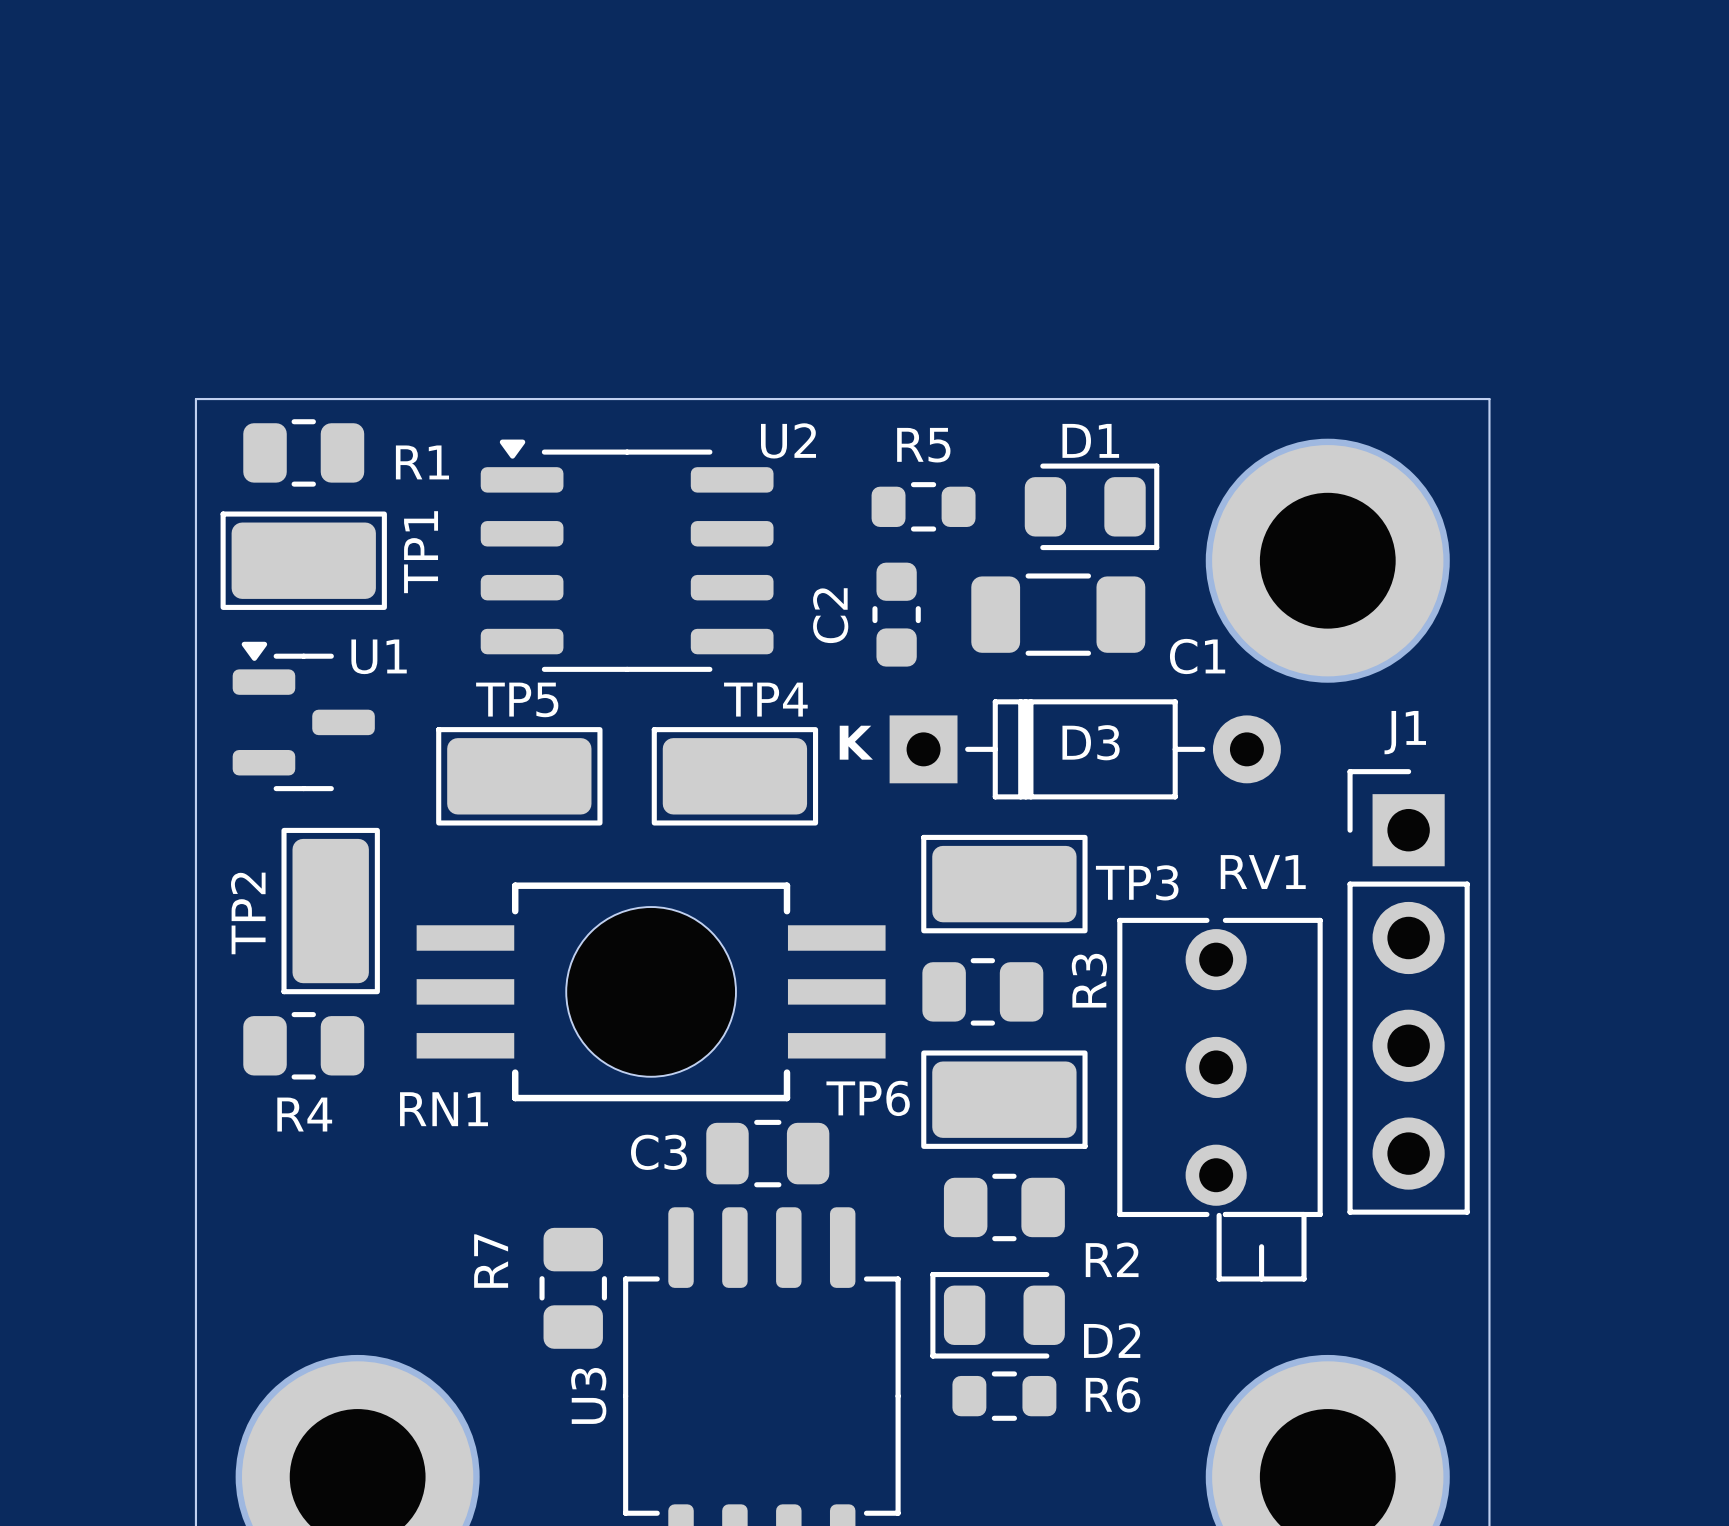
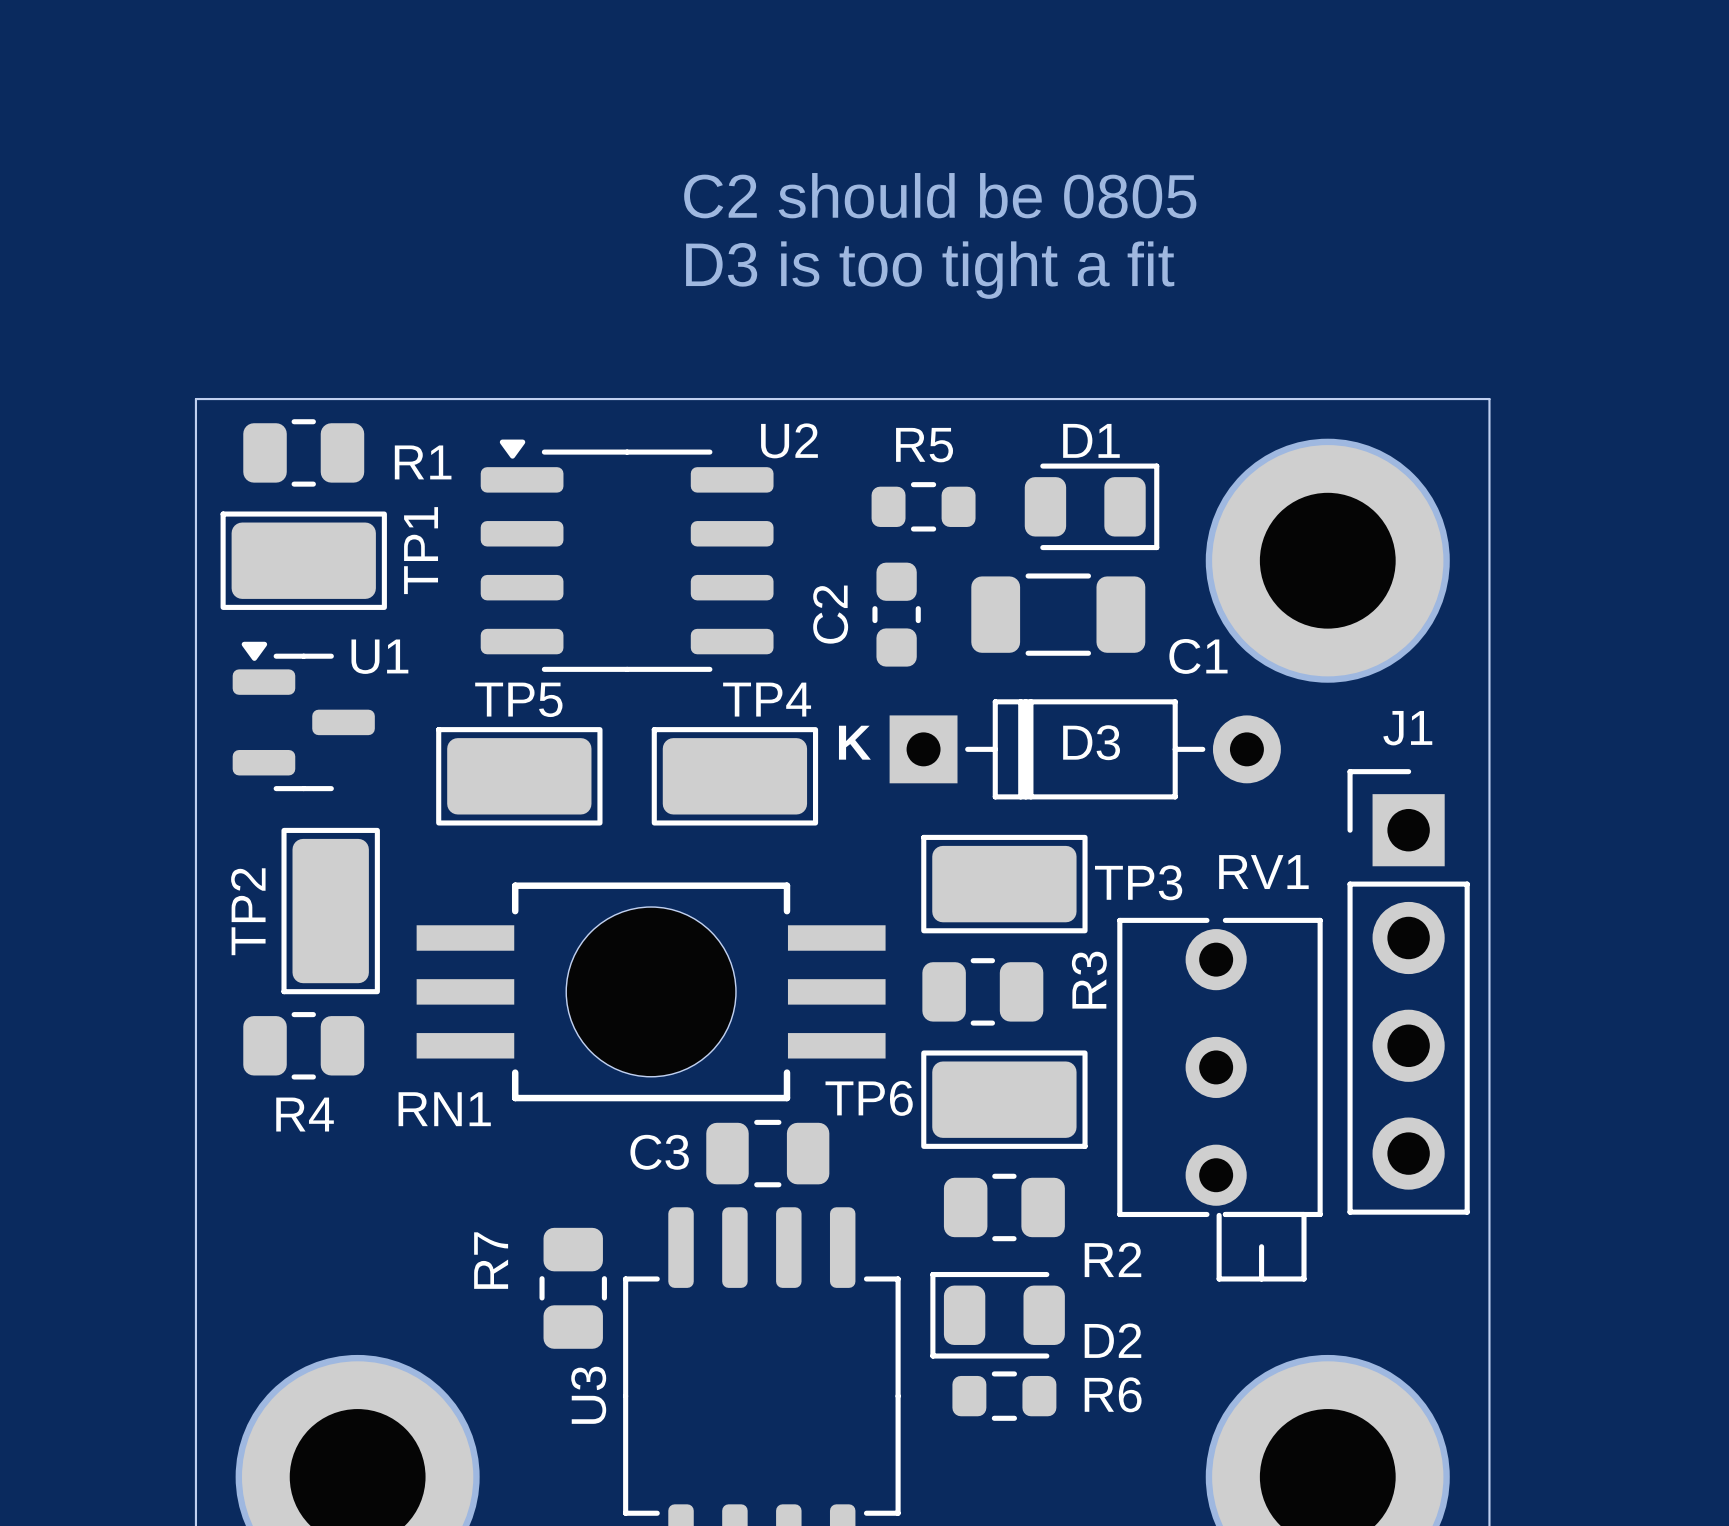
text: none -> C2 should be 0805 (940, 195)
text: none -> D3 is too tight a fit (930, 270)

